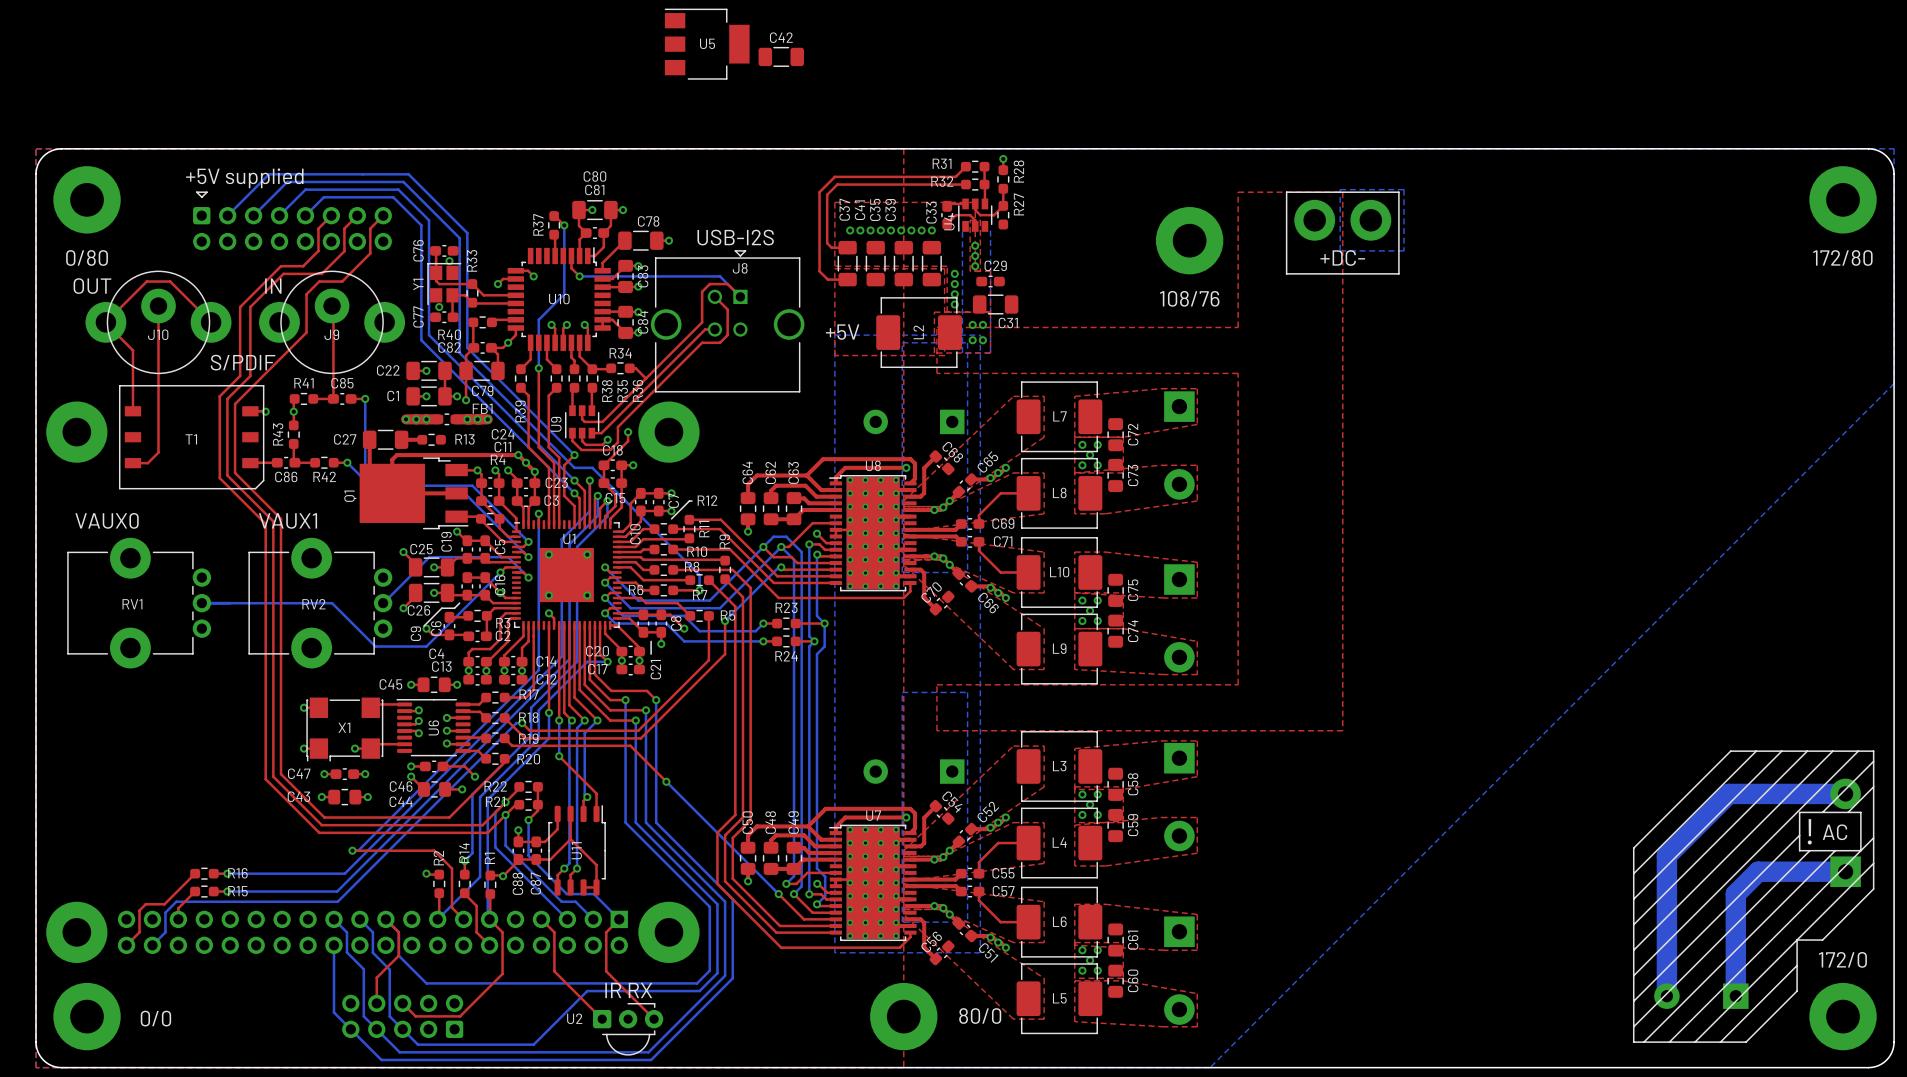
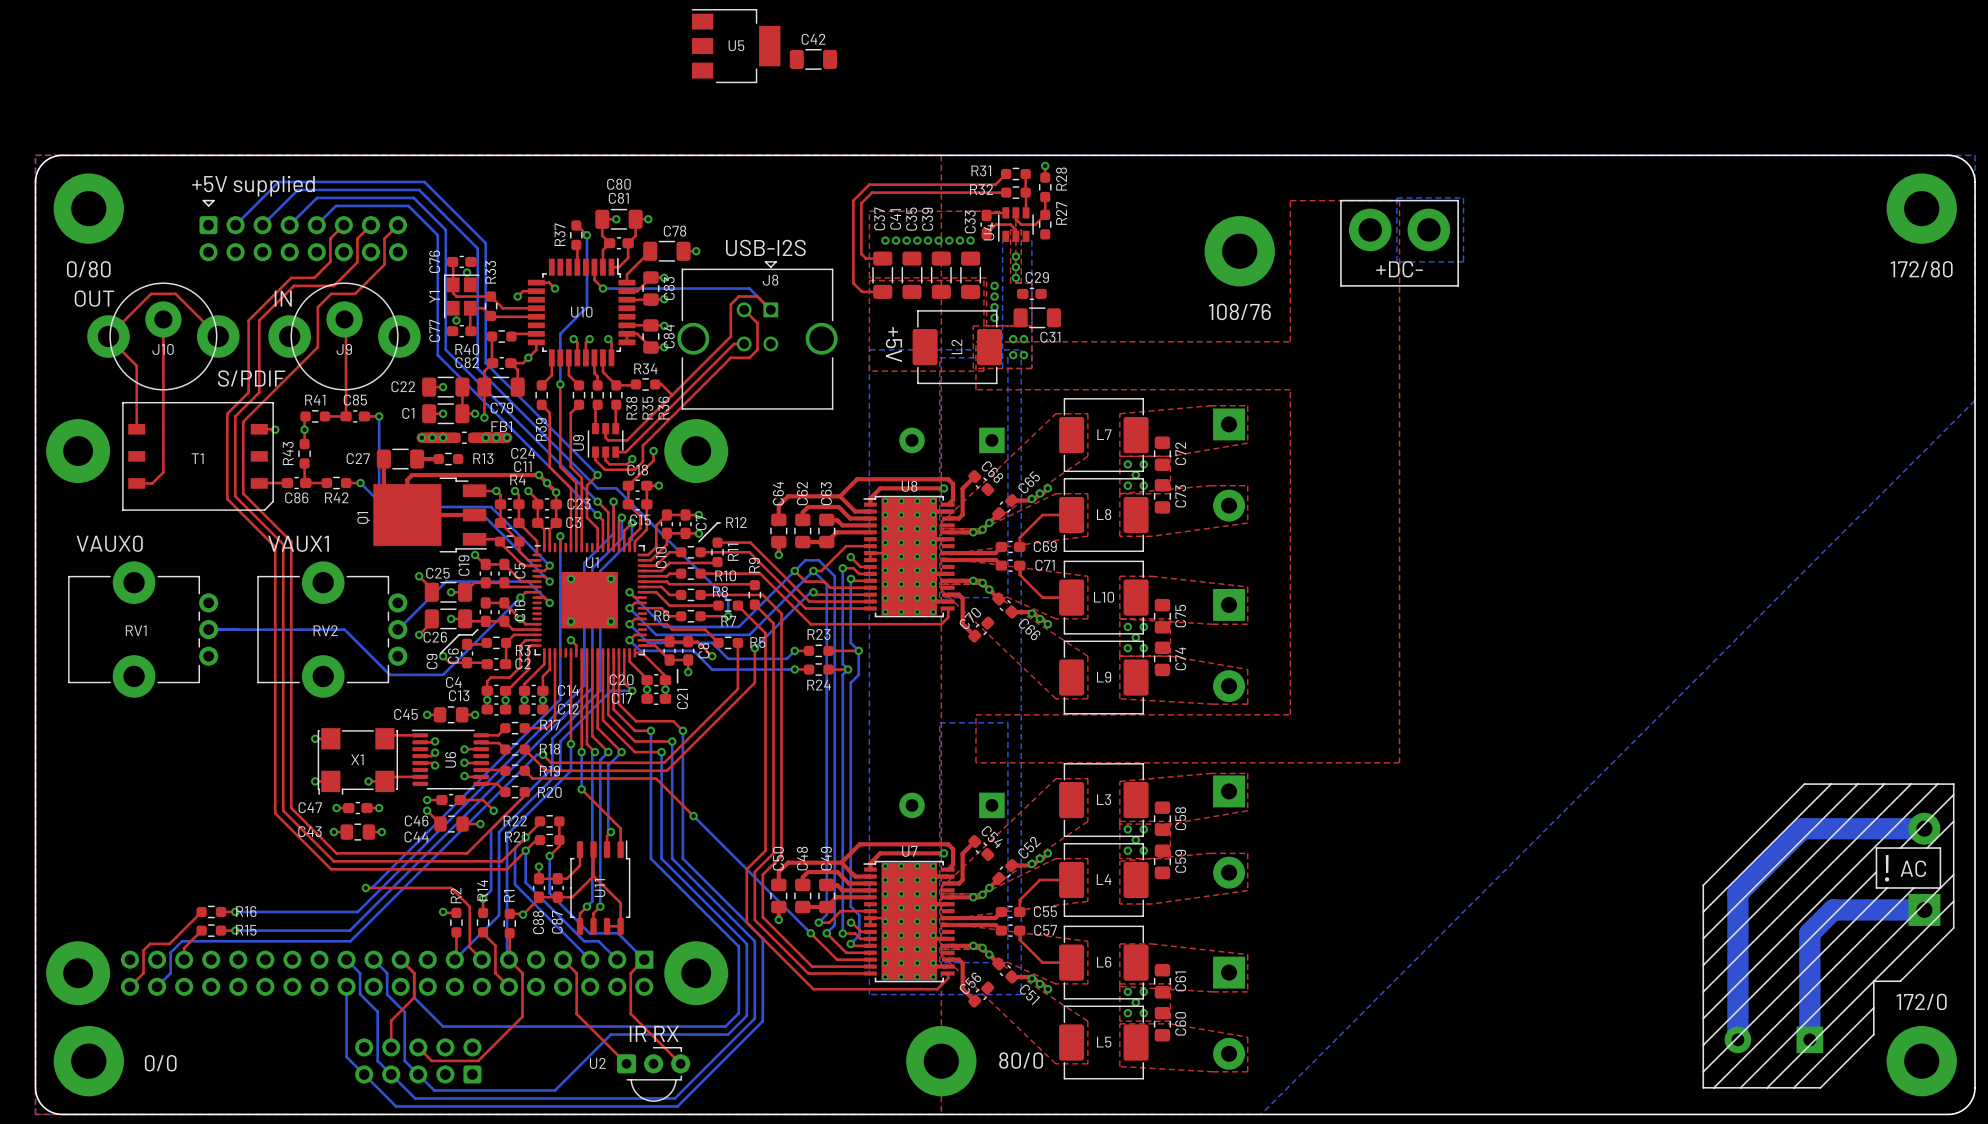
text rotation: 0° (842, 332) -> 90° clockwise (893, 344)

